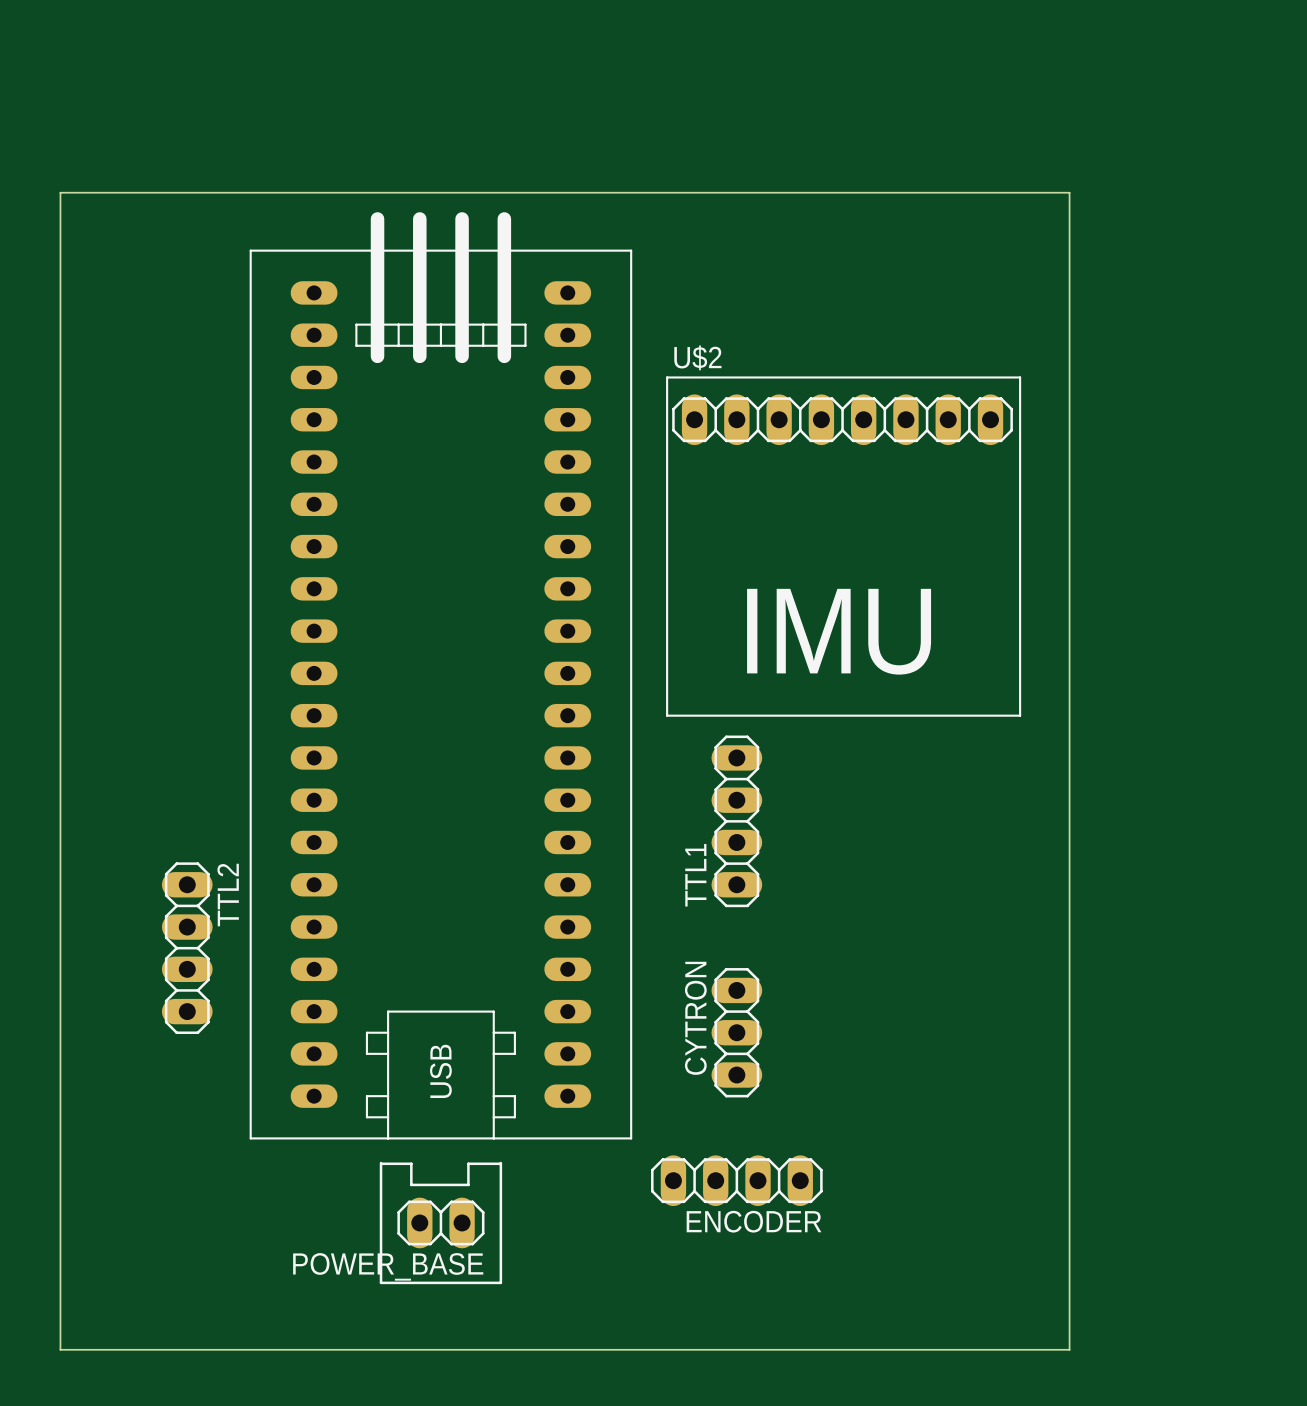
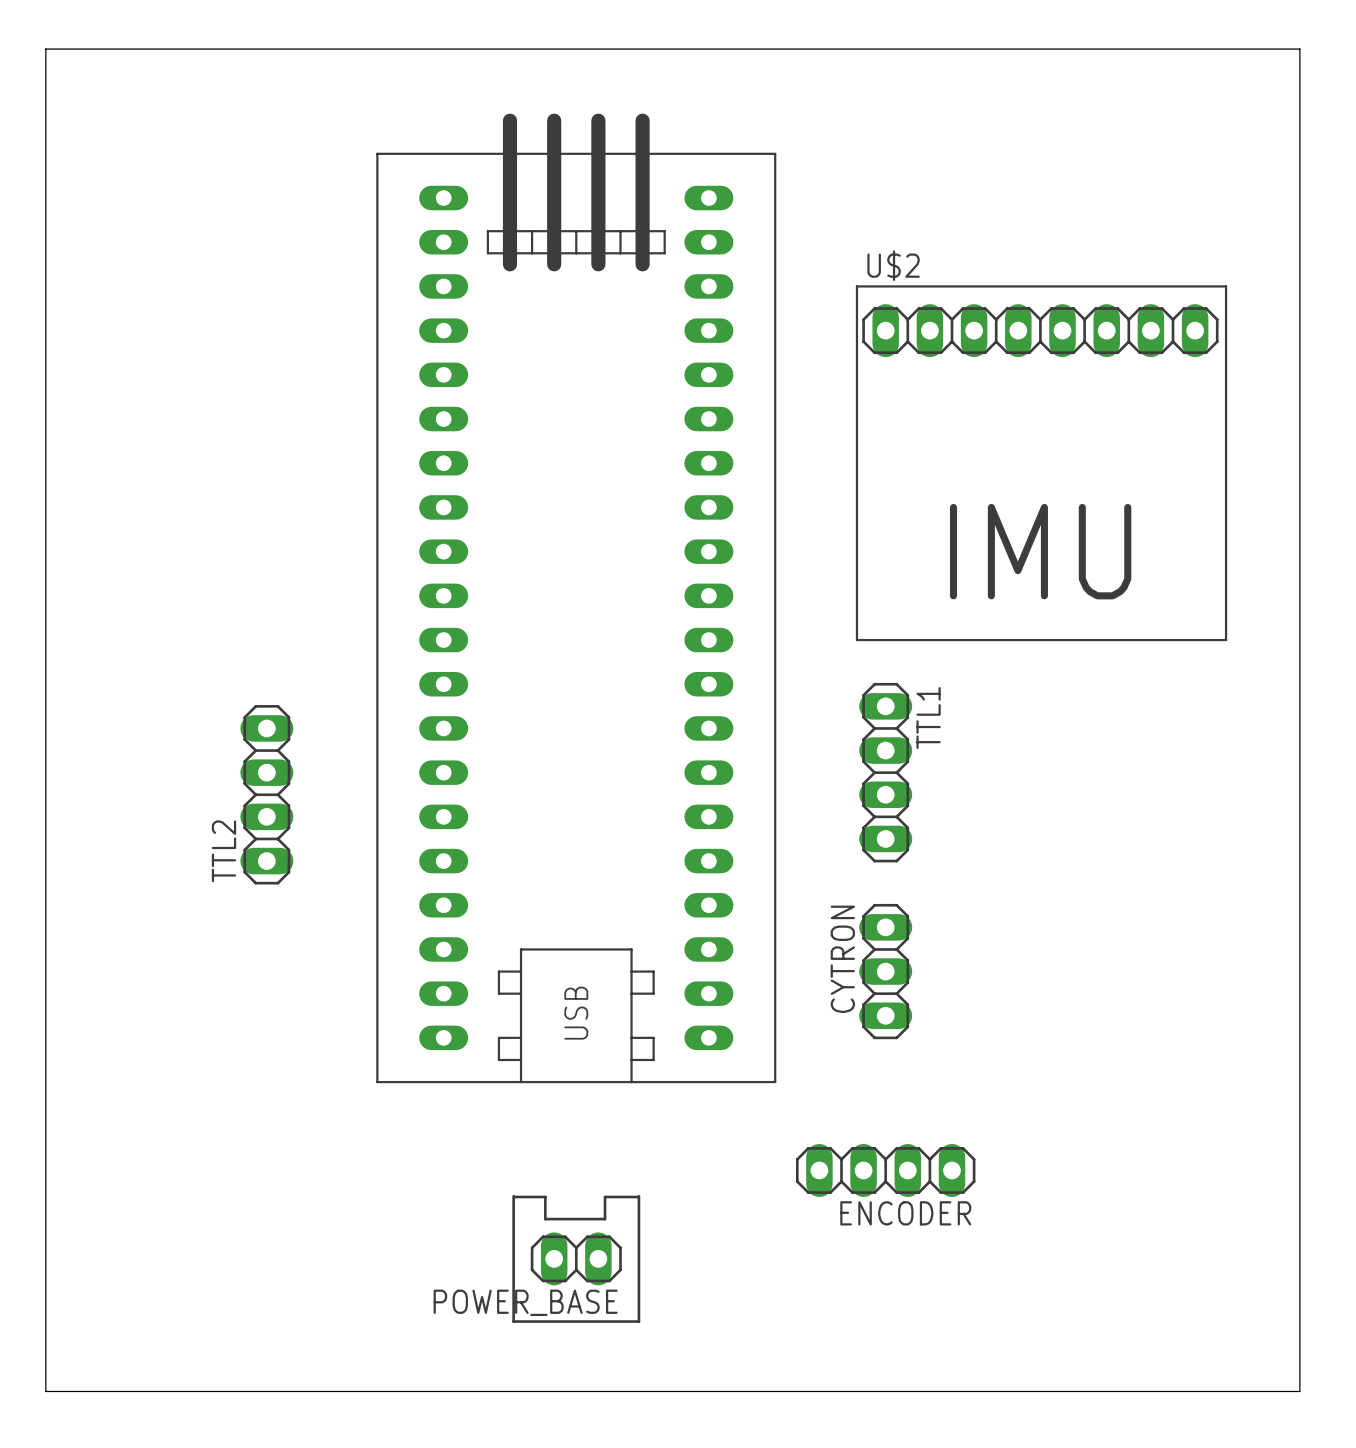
board edge: (60, 192) (1069, 192) (1069, 1349) -> (45, 181) (45, 49) (1299, 49) (1299, 1391) (1100, 1391)
U$2 position: (843, 546) -> (1041, 463)
part position: (440, 675) -> (576, 598)
TTL1 position: (736, 821) -> (885, 772)
TTL1 name position: TTL1 (695, 875) -> TTL1 (928, 718)
TTL2 name position: TTL2 (228, 895) -> TTL2 (223, 851)
TTL2 position: (187, 948) -> (266, 794)
CYTRON position: (736, 1032) -> (885, 971)
ENCODER position: (736, 1180) -> (885, 1170)
POWER_BASE position: (440, 1222) -> (576, 1258)

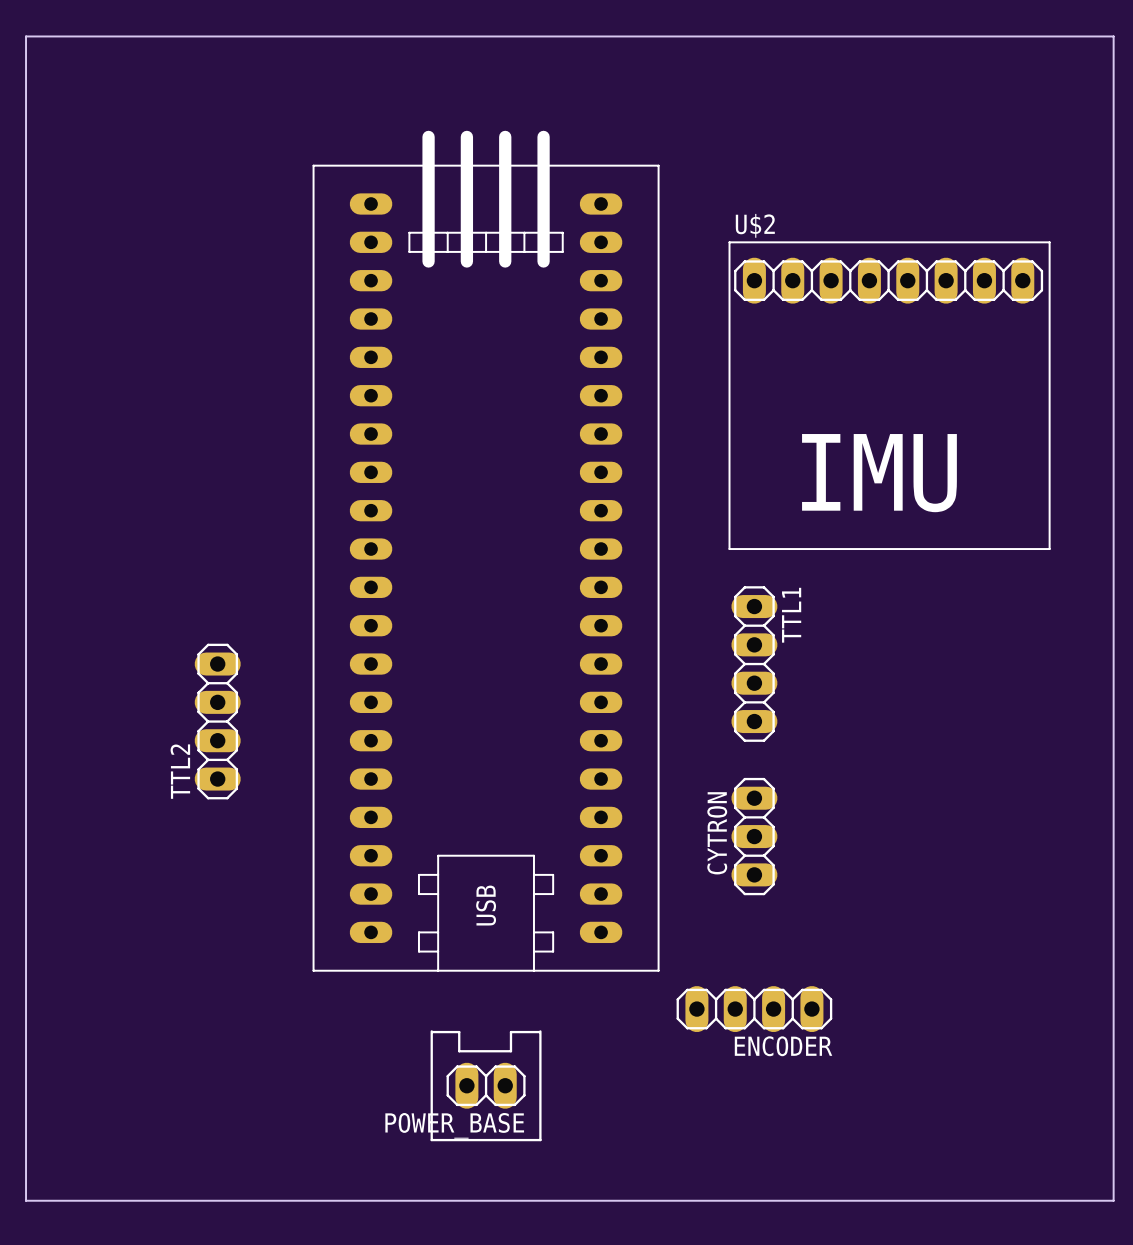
part position: (576, 598) -> (486, 551)
TTL2 position: (266, 794) -> (217, 721)

